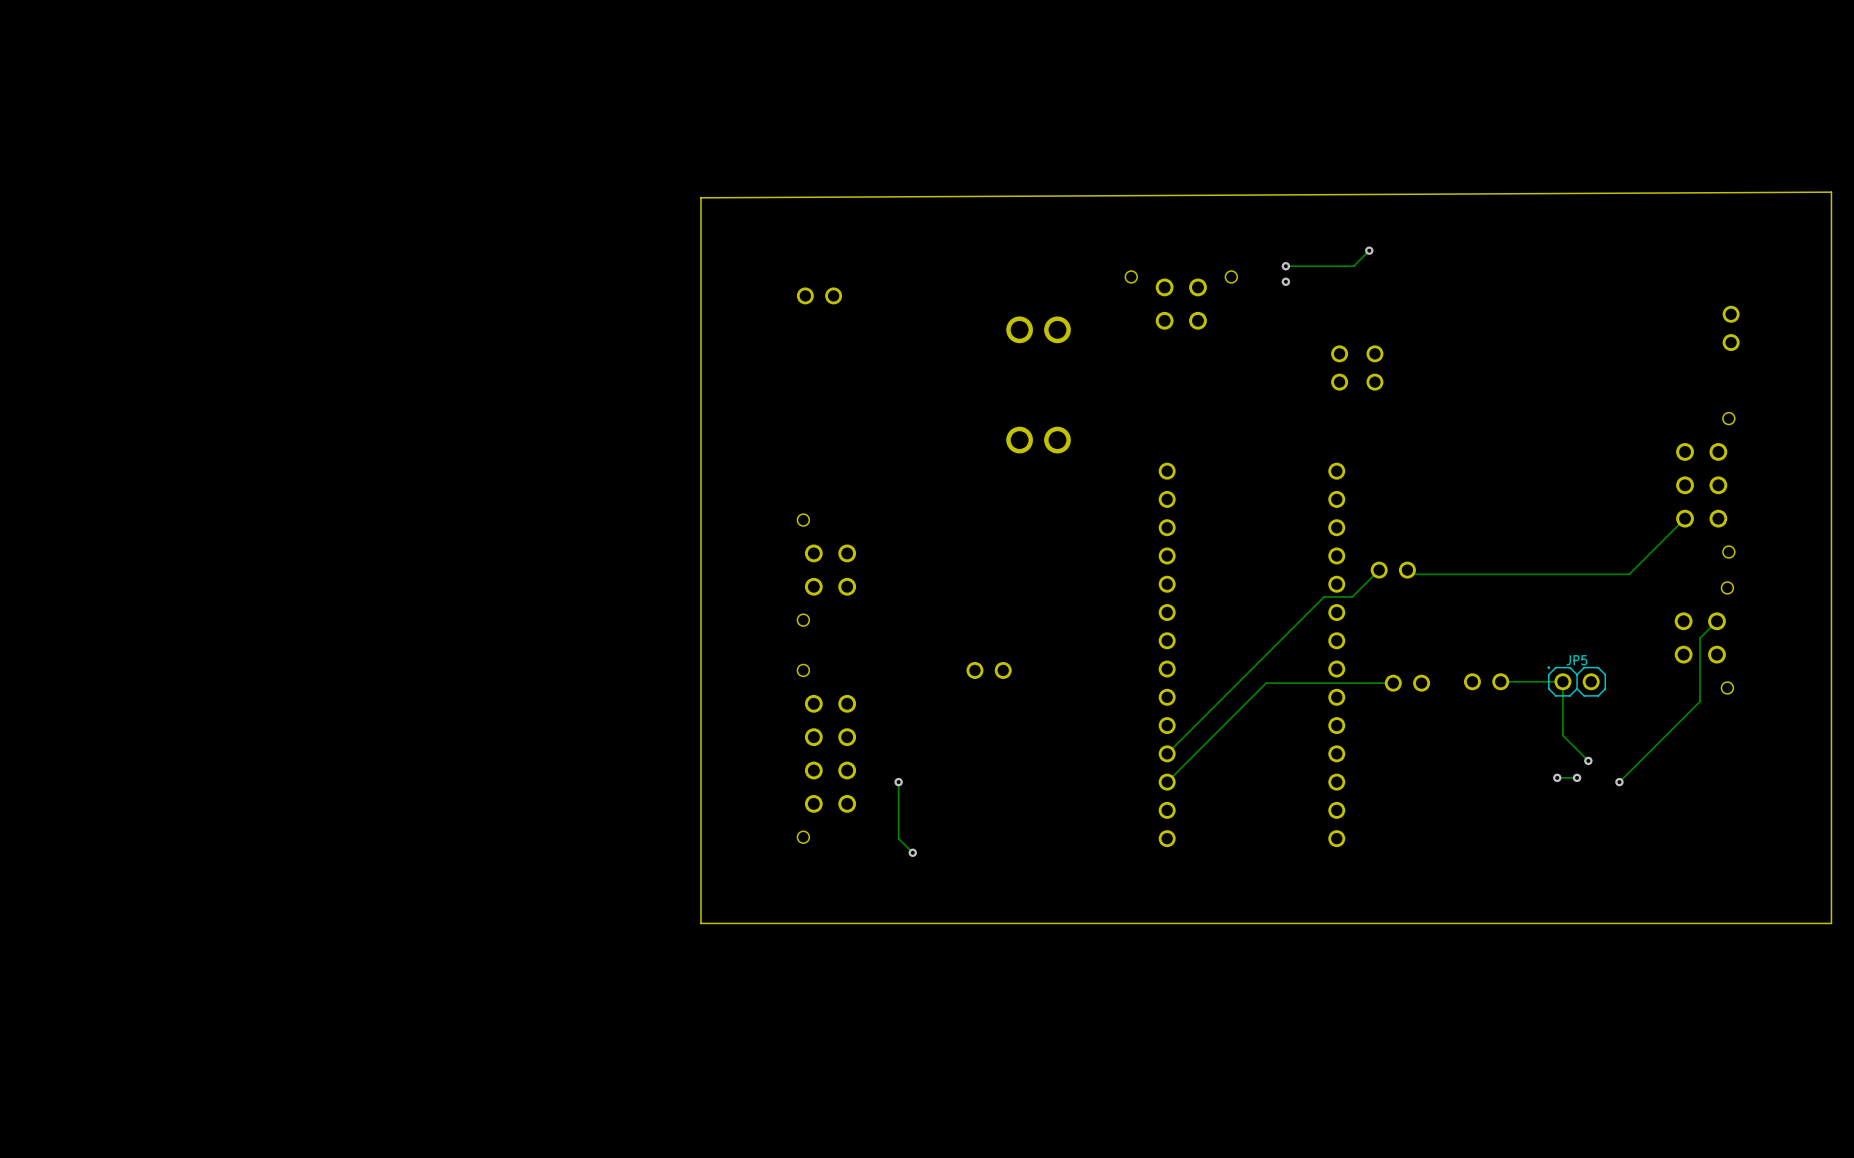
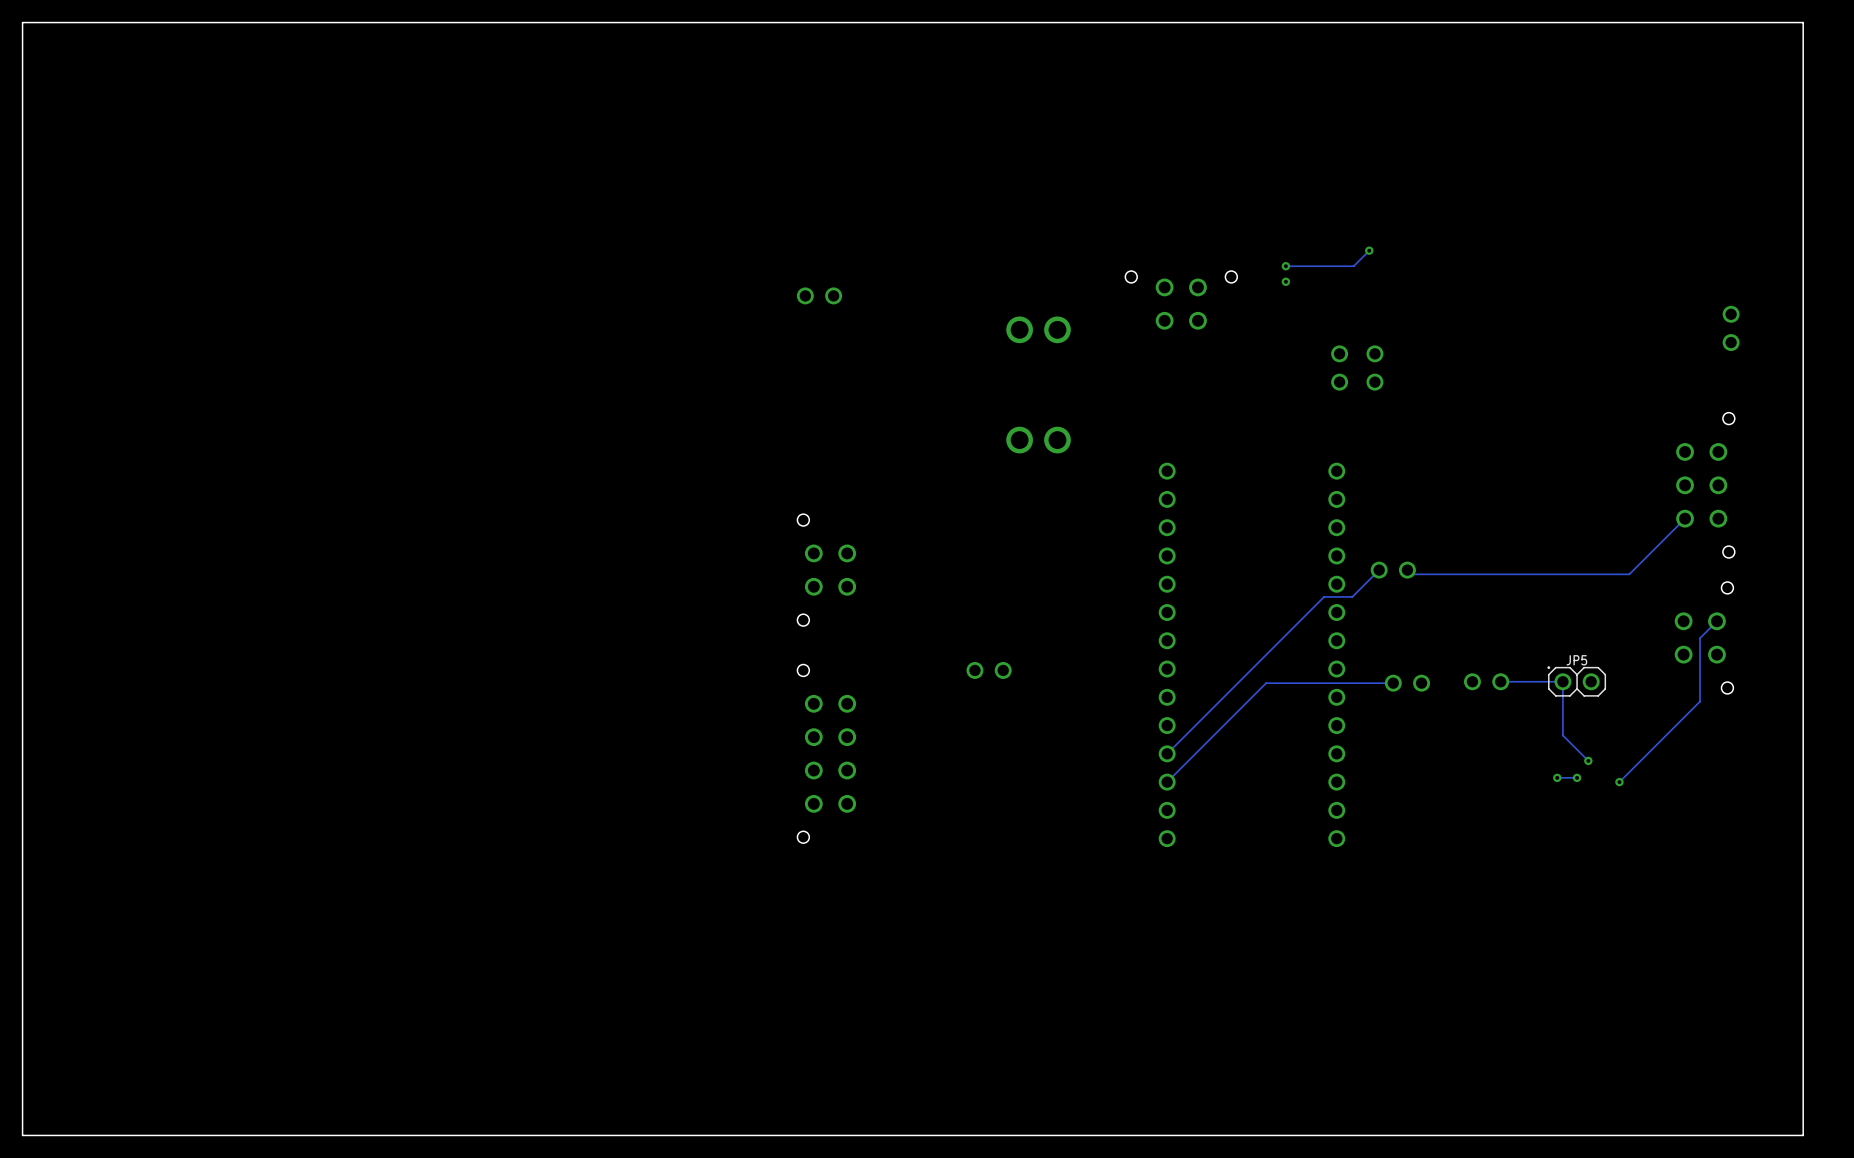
board edge: none -> (1803, 22) (22, 22) (22, 1135) (1803, 1135) (1803, 22)
board edge: (1831, 192) (700, 197) (700, 923) (1831, 923) (1831, 192) -> none
track: (898, 782) (898, 838) (912, 852) -> none
via: (898, 782) -> none
via: (912, 852) -> none

